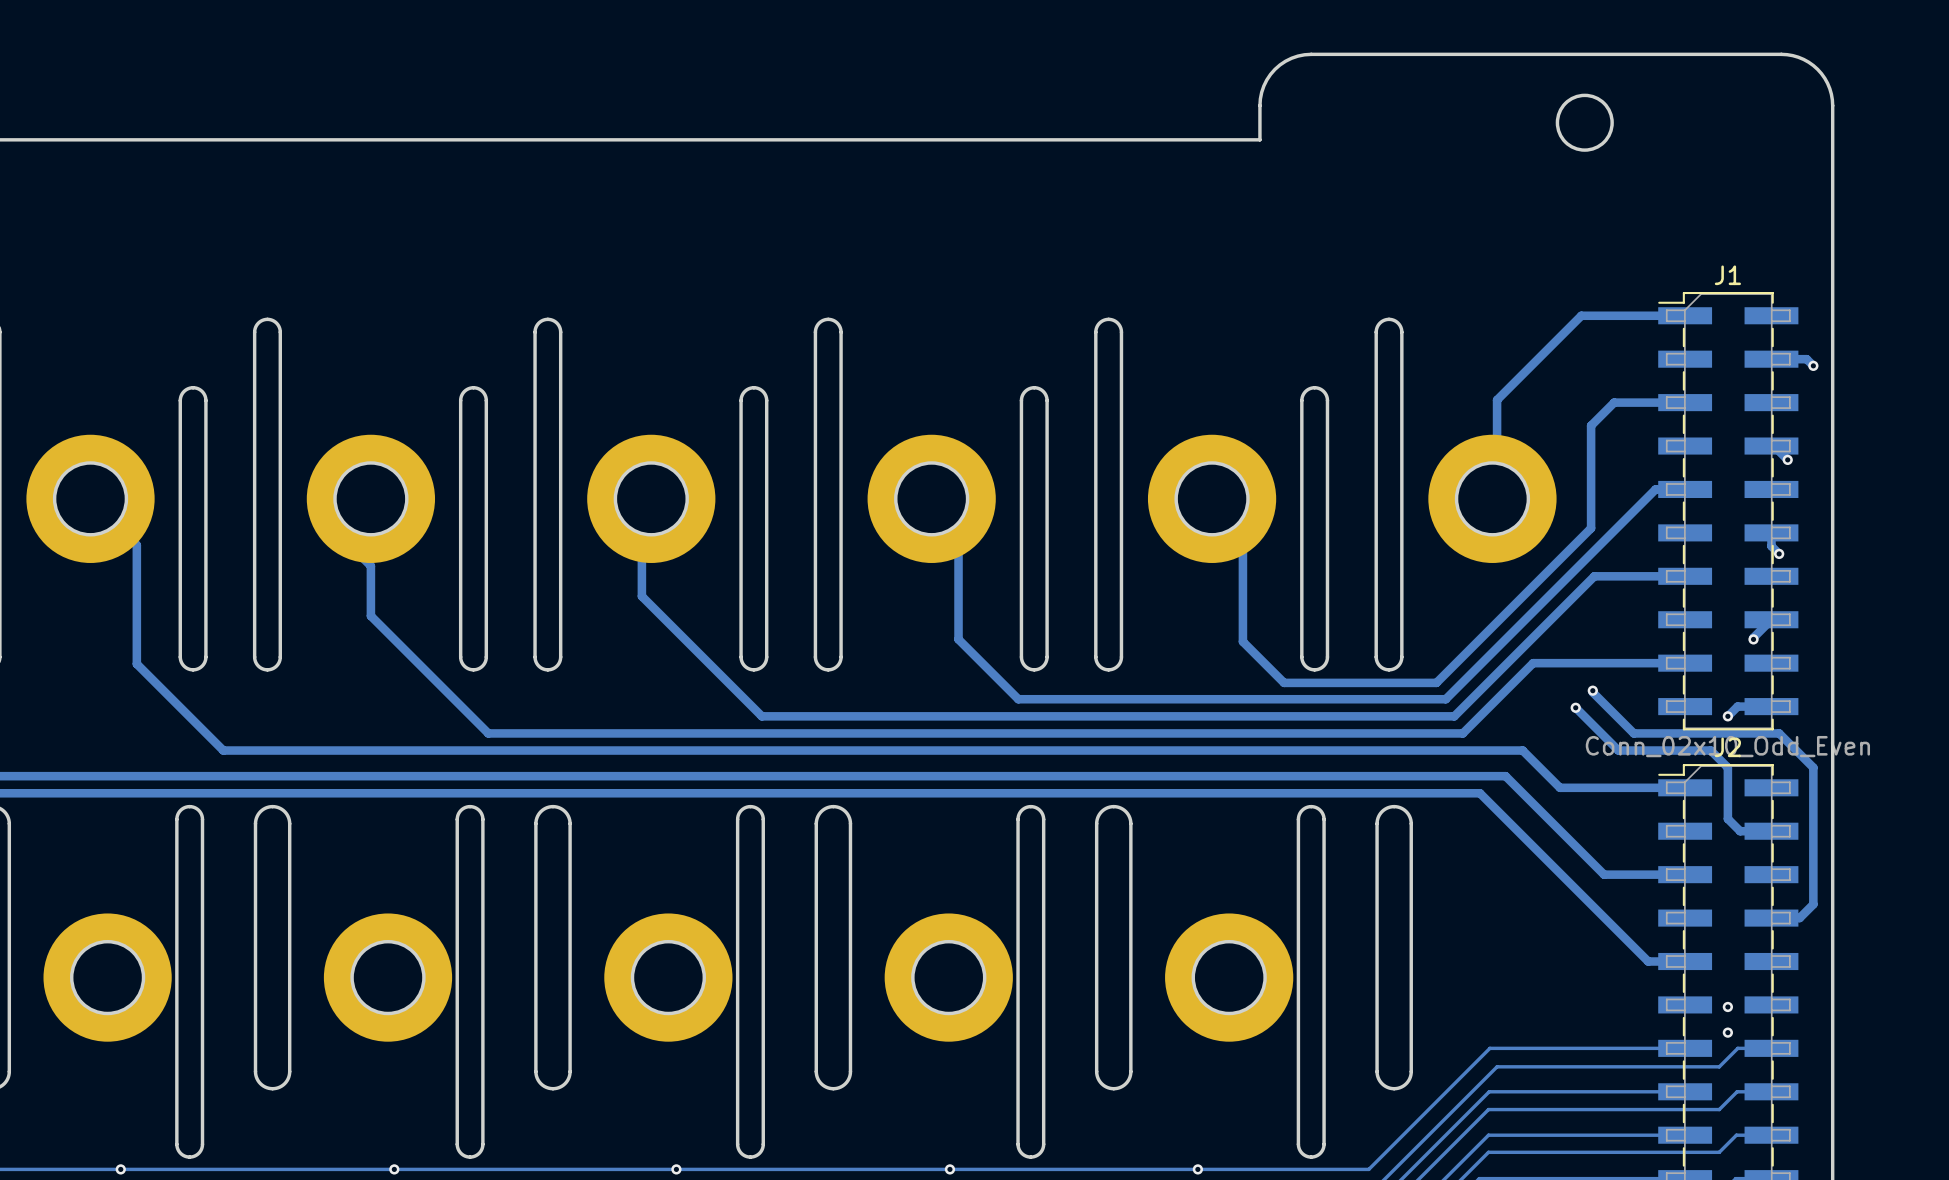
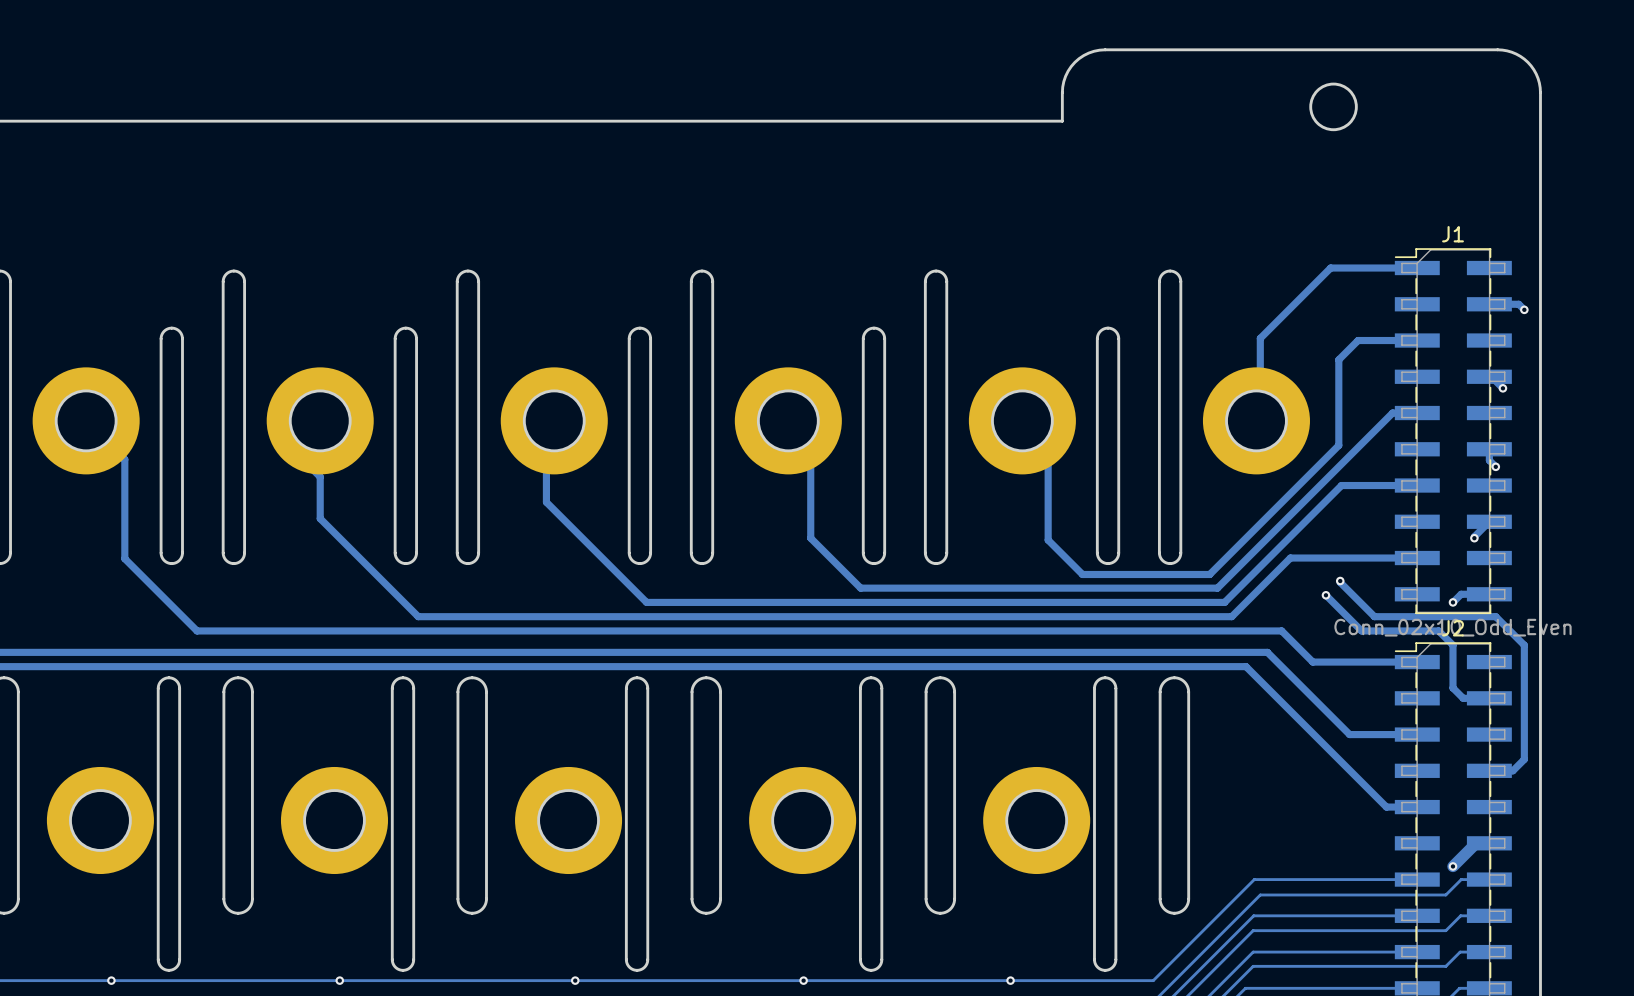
track: none -> (1489, 843) (1476, 843) (1452, 866)
via: (1727, 1006) -> none

